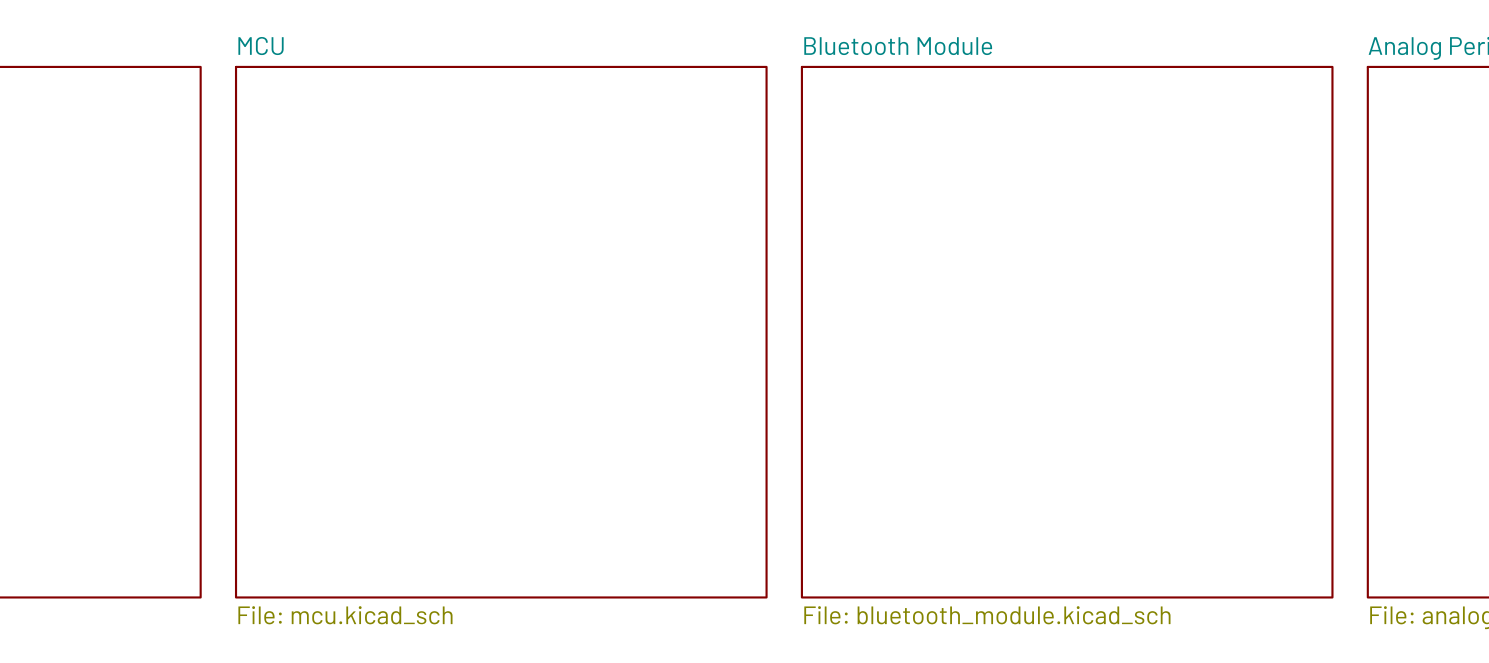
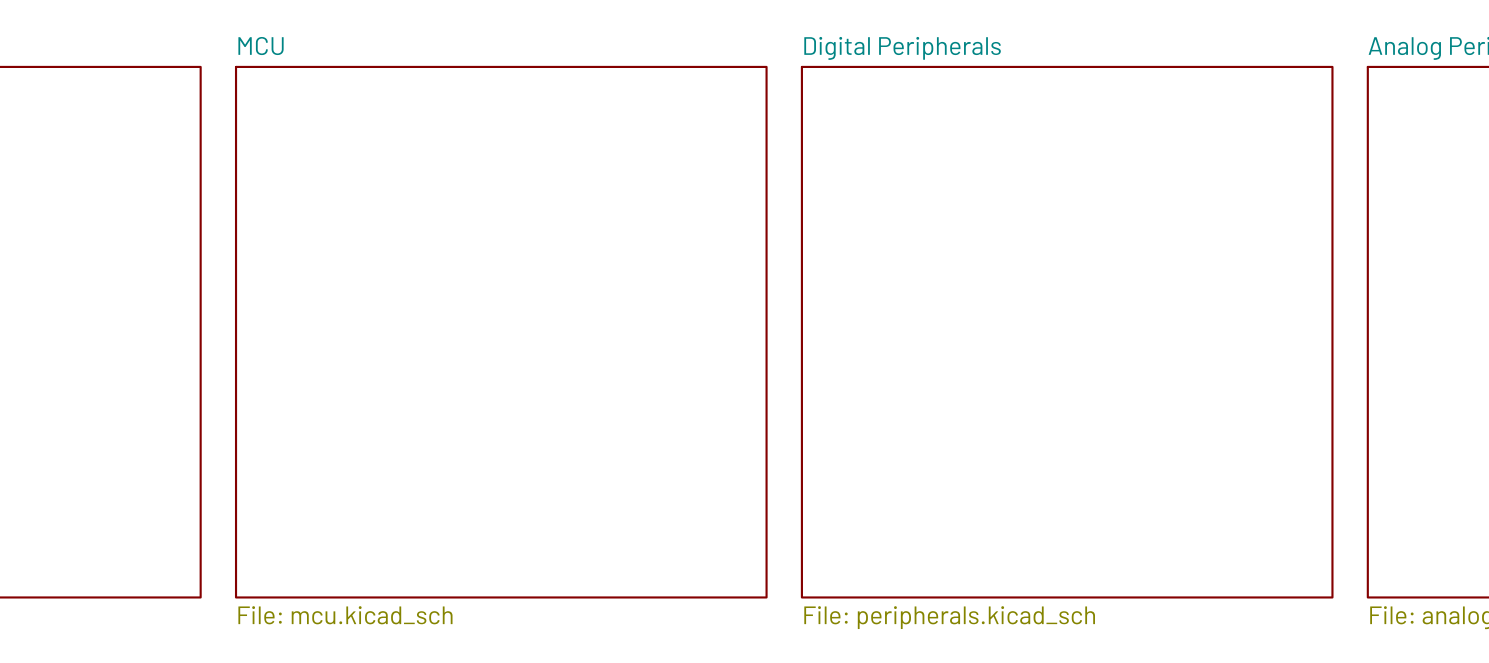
sheet Bluetooth Module name: Bluetooth Module (898, 46) -> Digital Peripherals (902, 48)
sheet Bluetooth Module value: File: bluetooth_module.kicad_sch (987, 615) -> File: peripherals.kicad_sch (949, 617)

